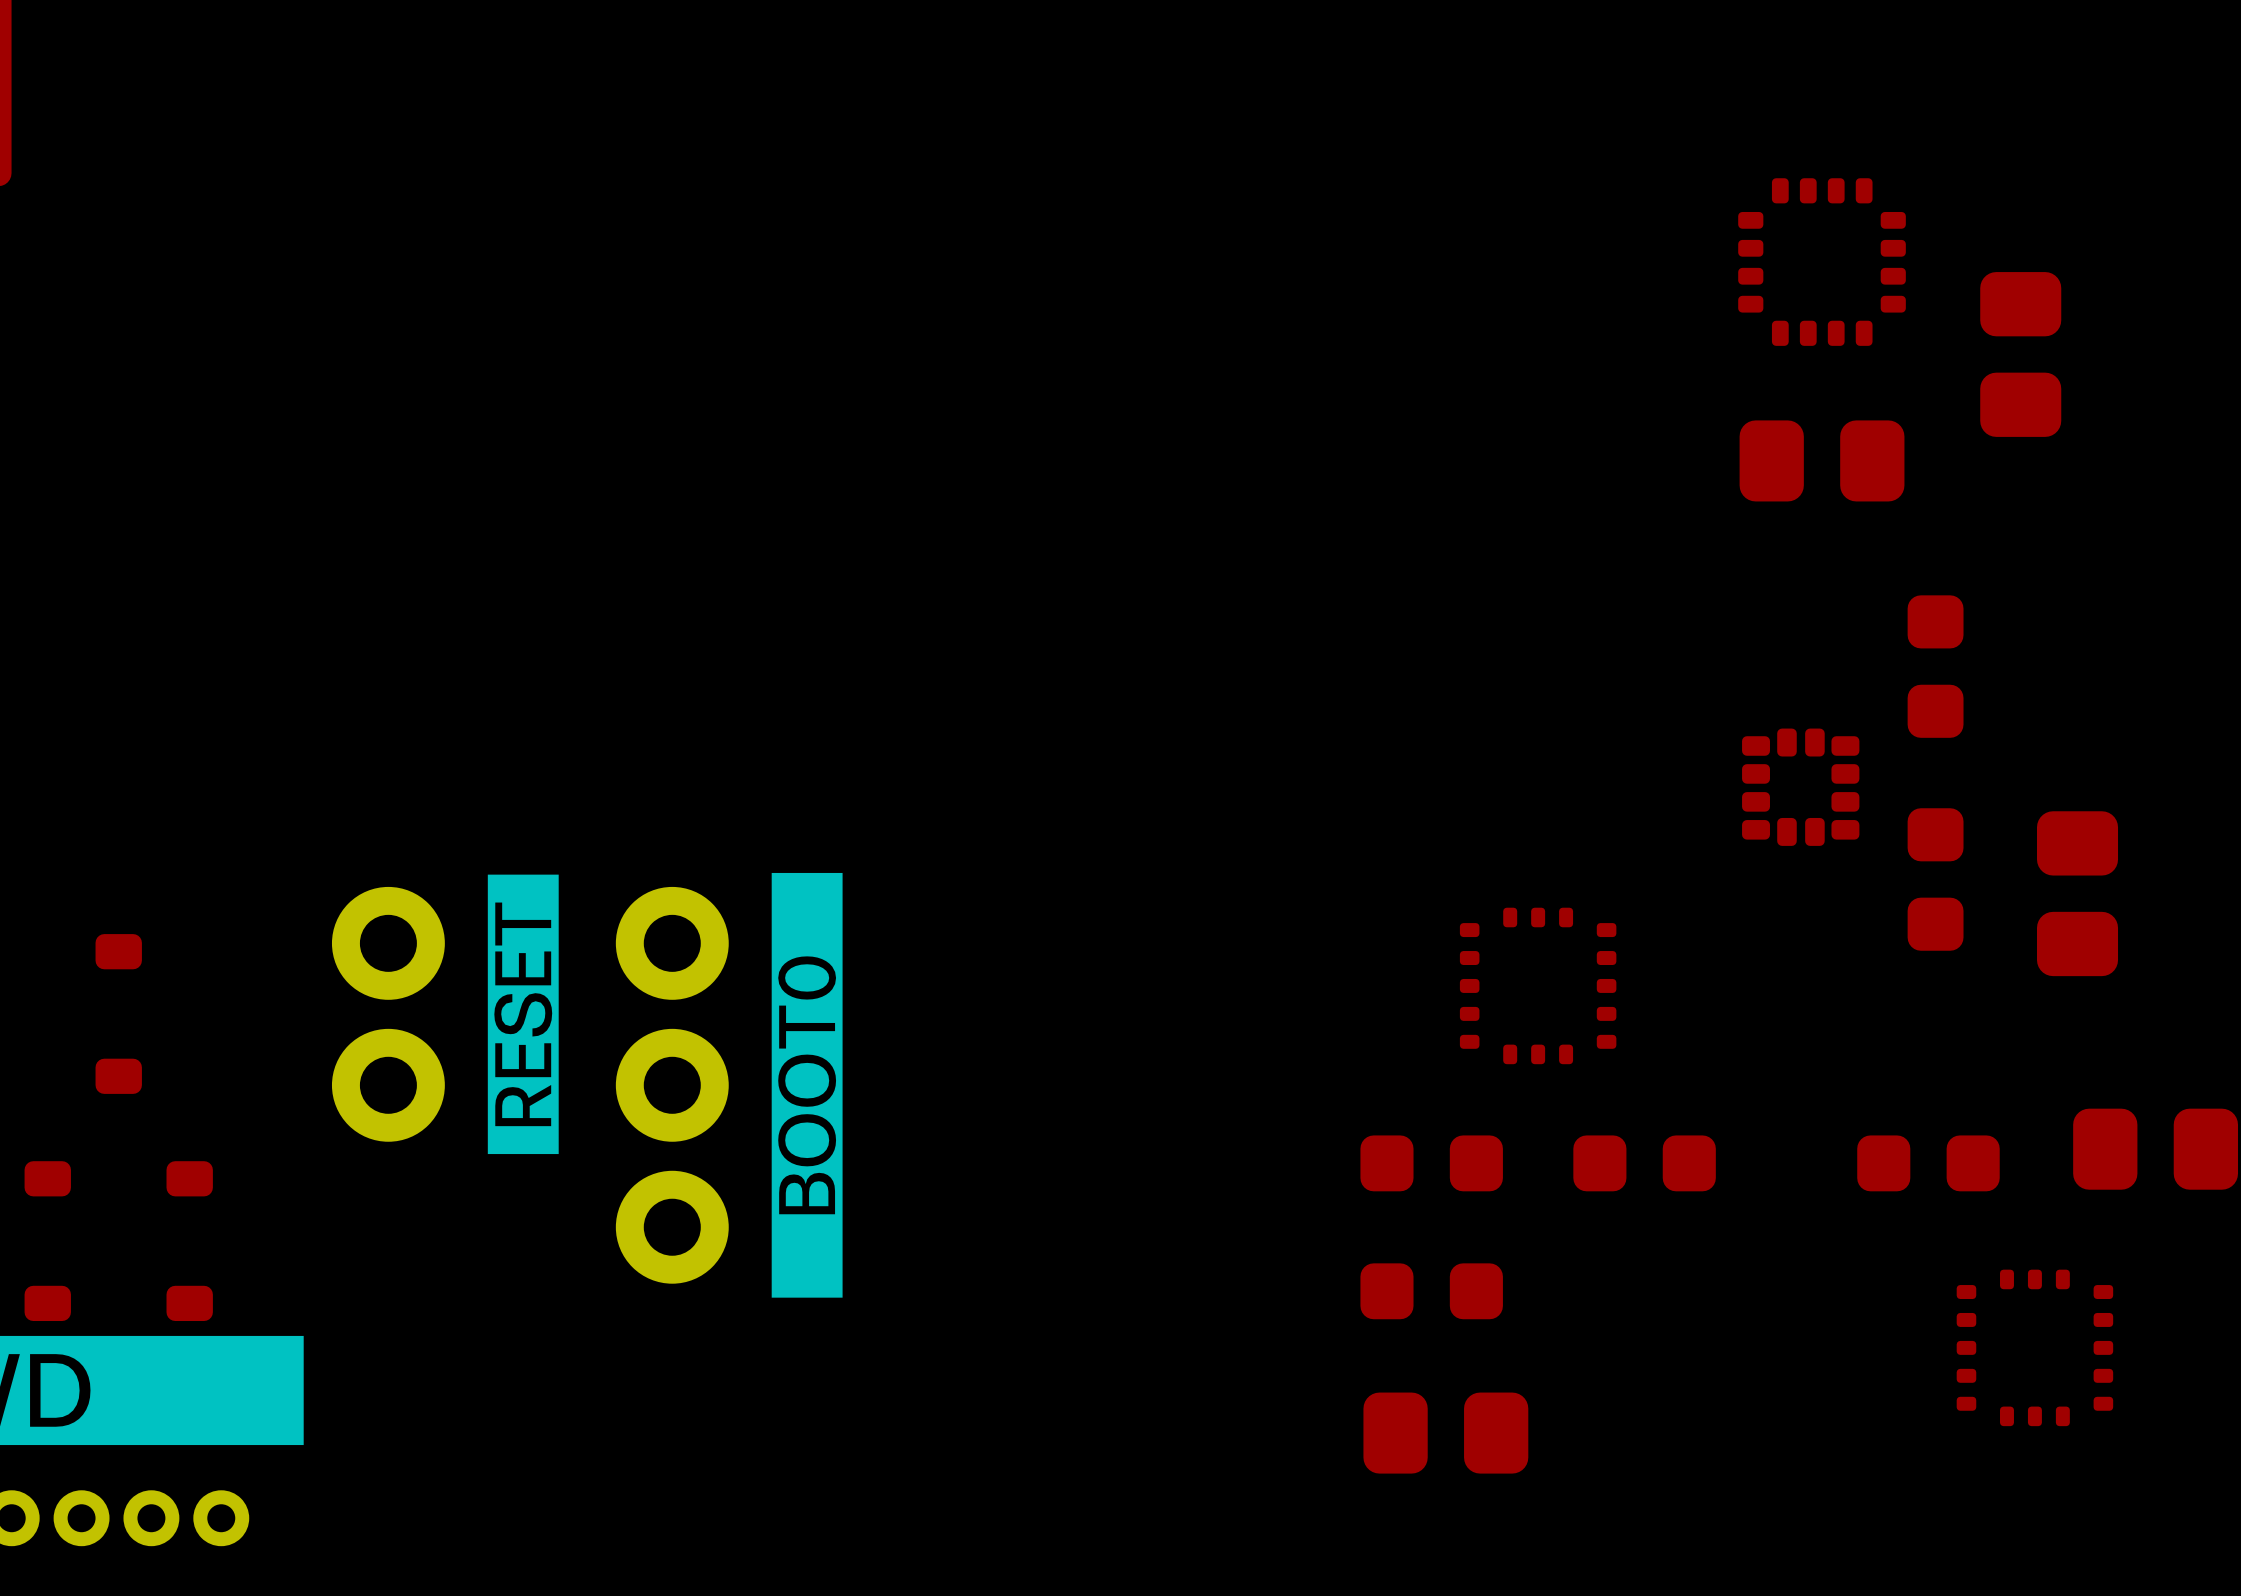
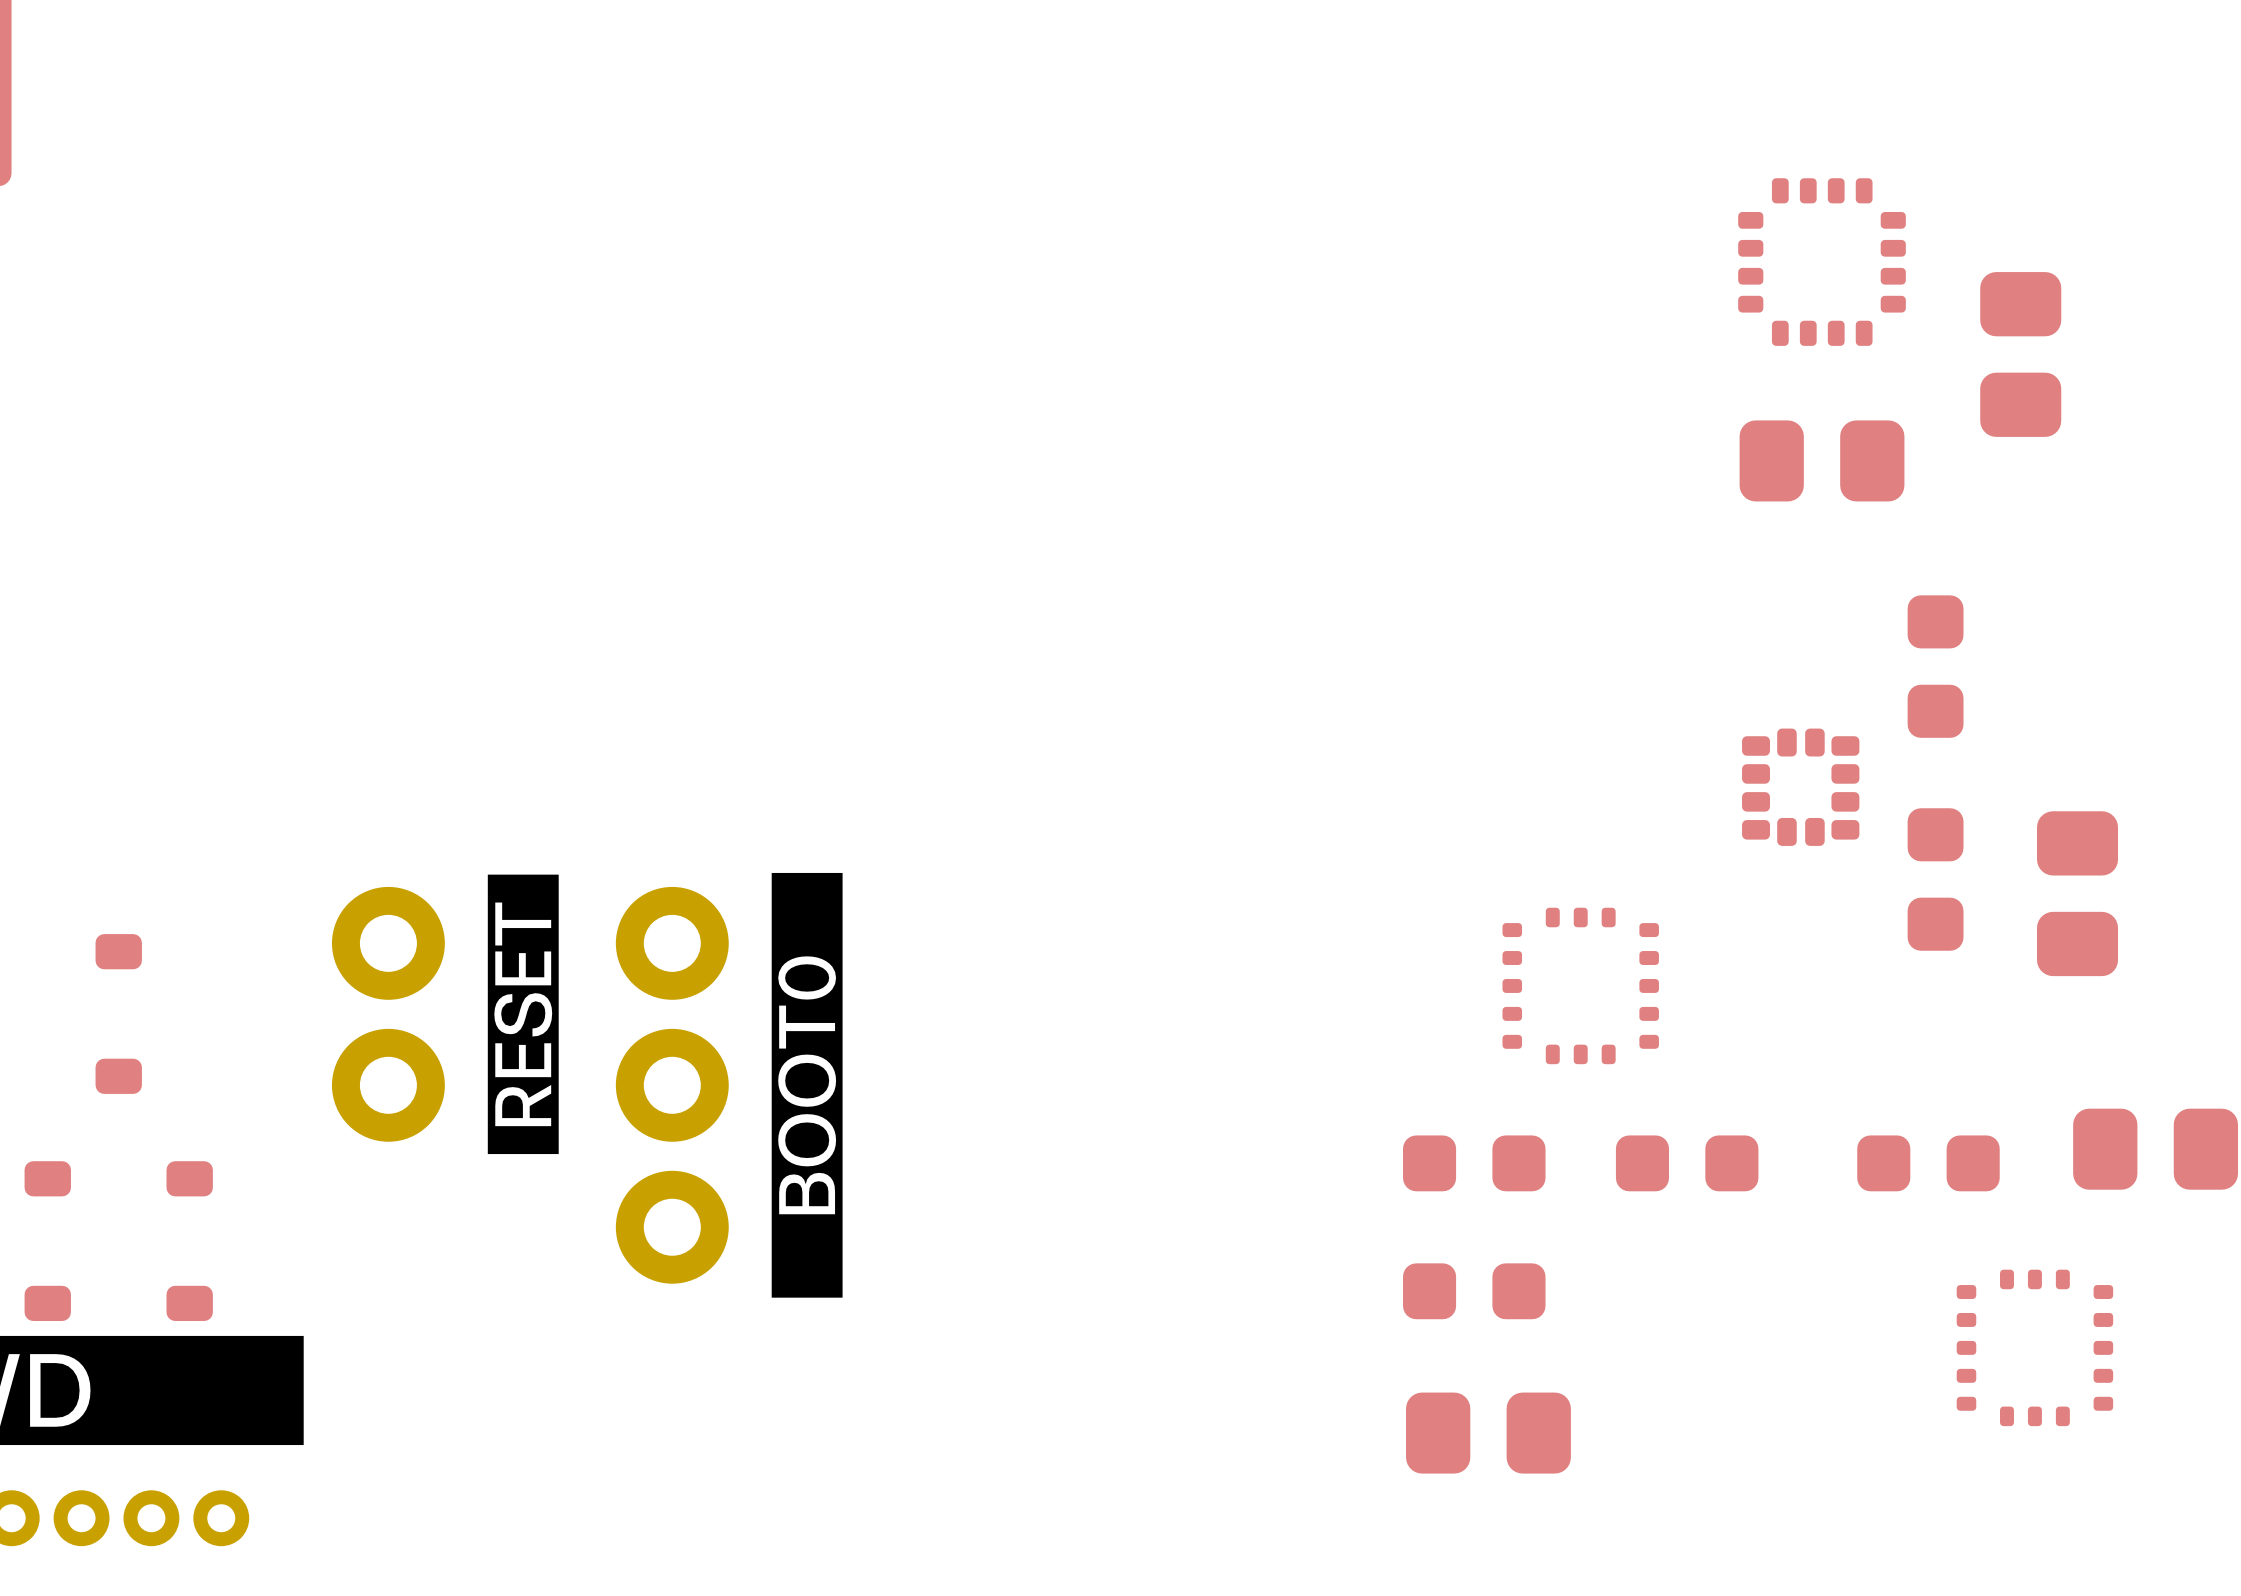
part position: (1538, 985) -> (1580, 985)
part position: (1431, 1163) -> (1474, 1163)
part position: (1644, 1163) -> (1687, 1163)
part position: (1431, 1291) -> (1474, 1291)
part position: (1445, 1433) -> (1488, 1433)

